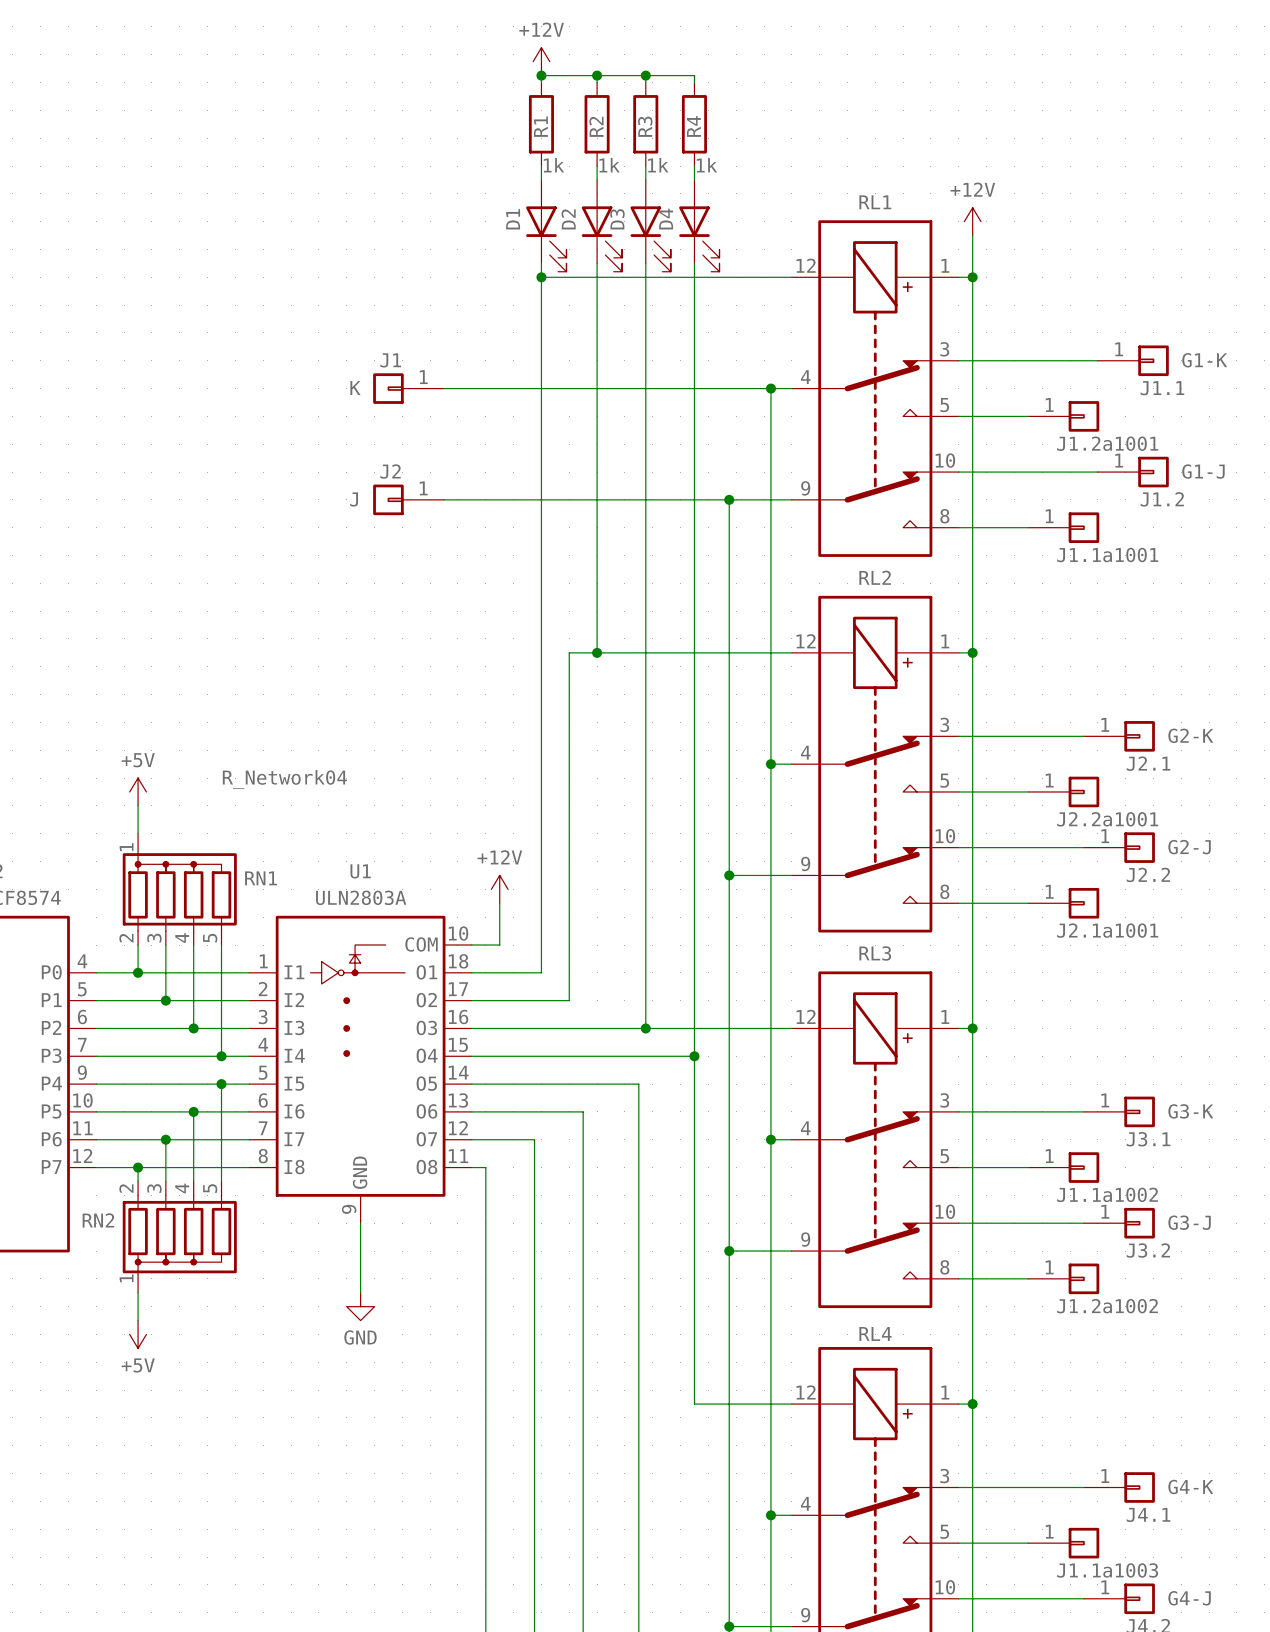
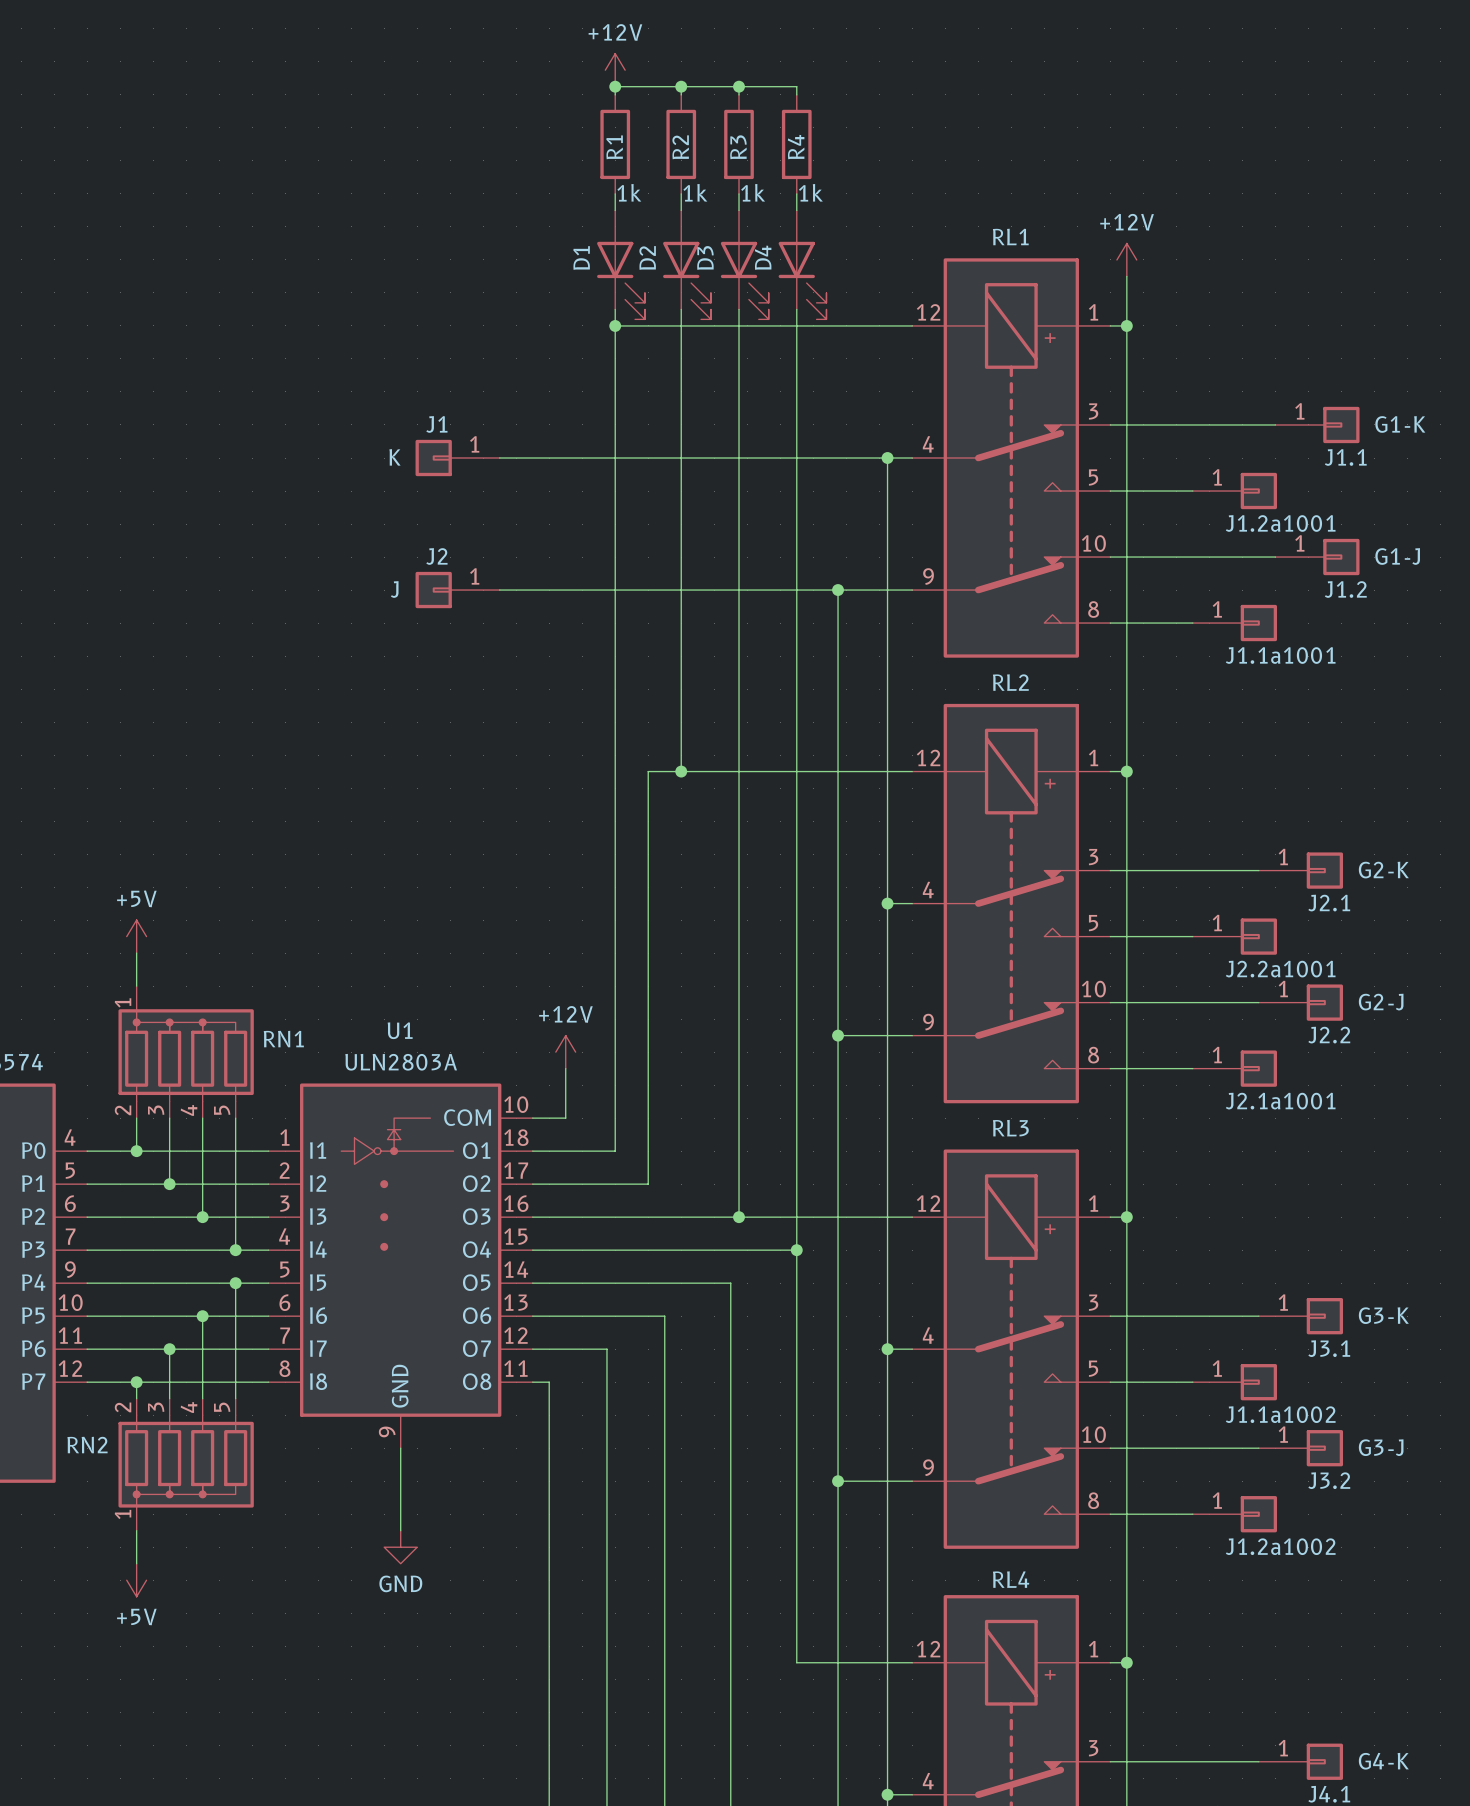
RN1 value: R_Network04 (284, 779) -> none

